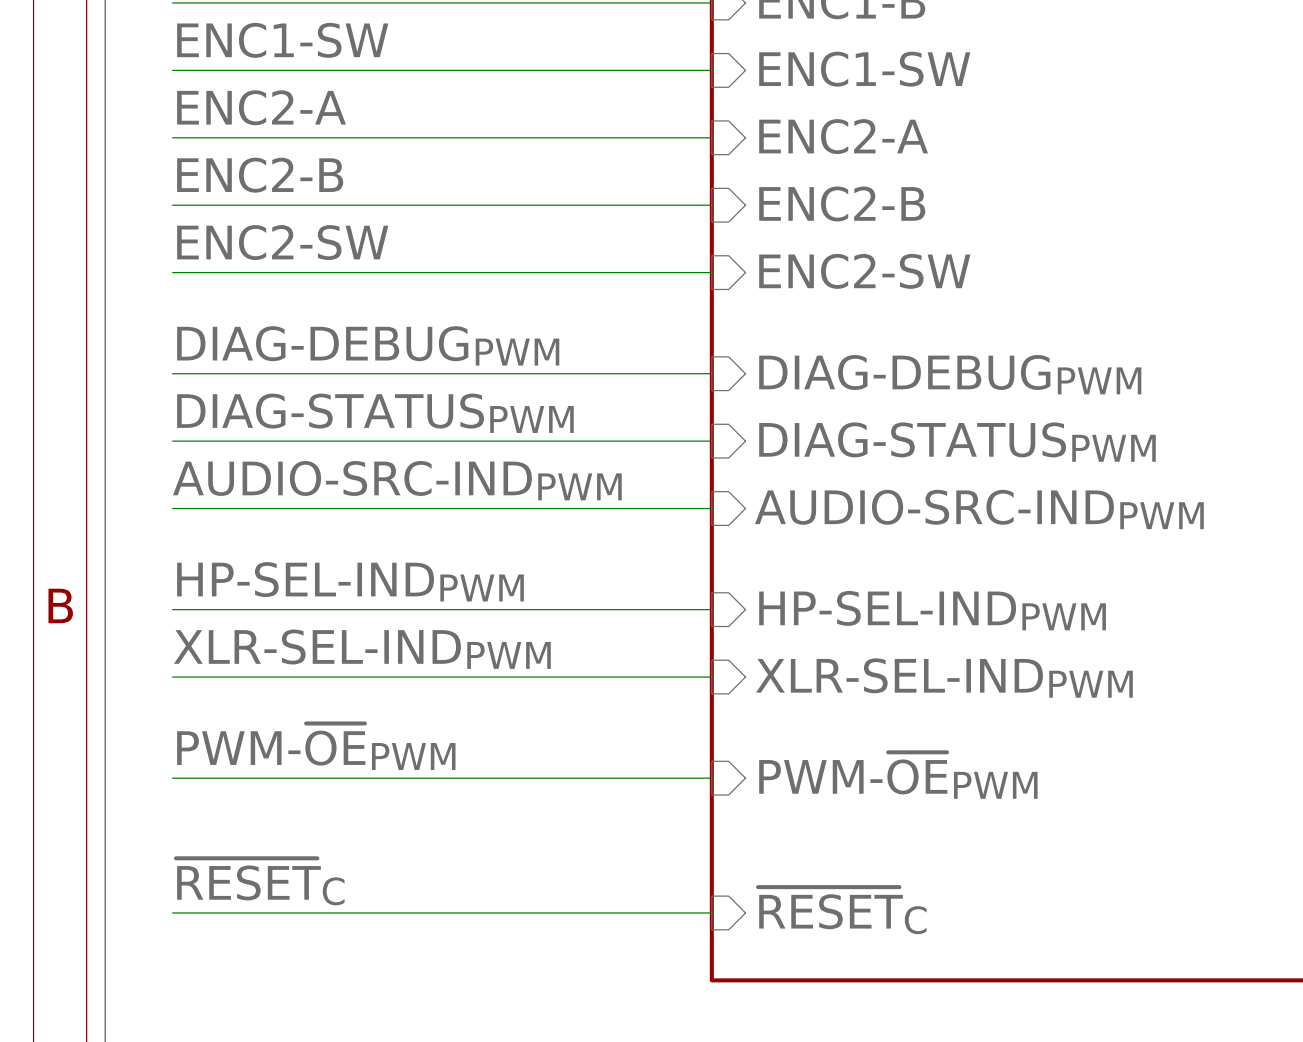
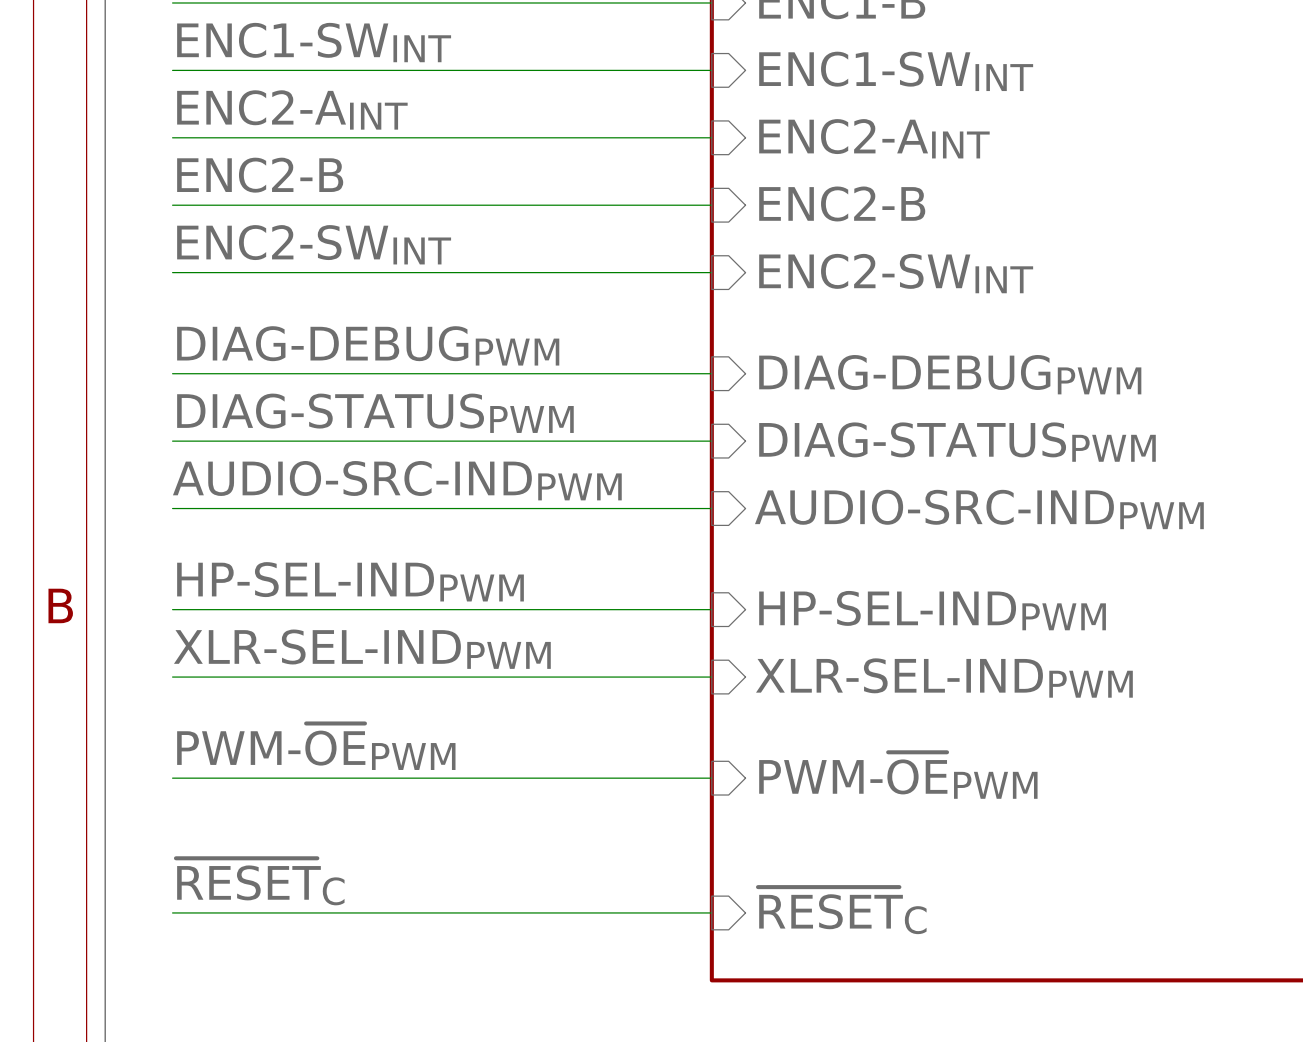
label: ENC1-SW (282, 40) -> ENC1-SWINT (314, 42)
sheet pin: ENC1-SW (864, 69) -> ENC1-SWINT (896, 71)
label: ENC2-A (261, 107) -> ENC2-AINT (292, 109)
sheet pin: ENC2-A (843, 136) -> ENC2-AINT (874, 138)
label: ENC2-SW (282, 242) -> ENC2-SWINT (314, 244)
sheet pin: ENC2-SW (864, 271) -> ENC2-SWINT (896, 273)

